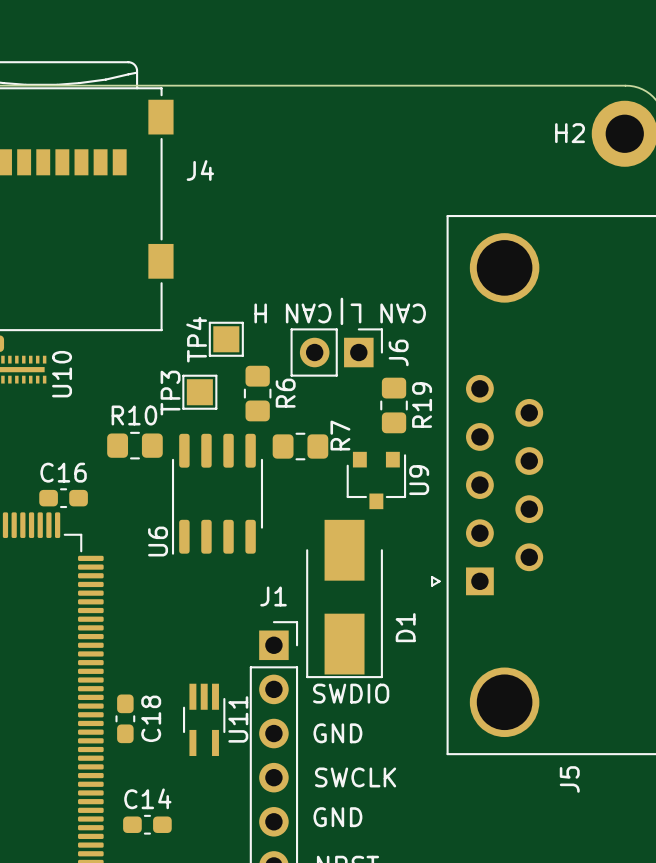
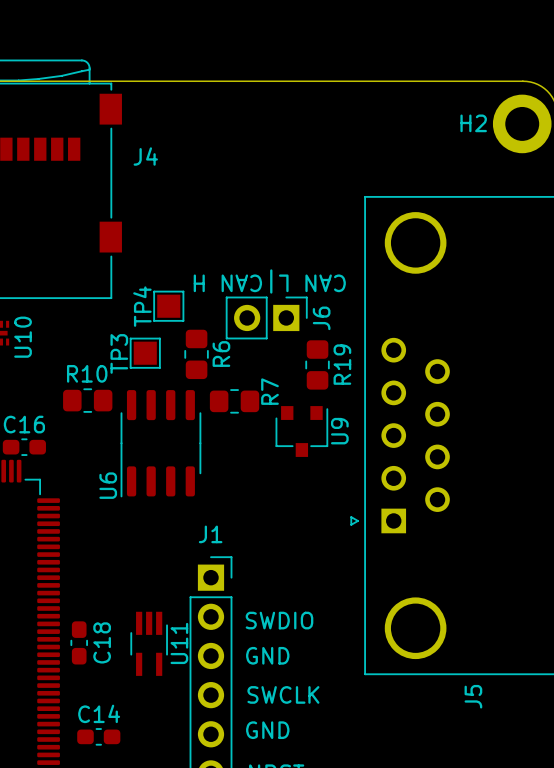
D1: (344, 598) -> none

